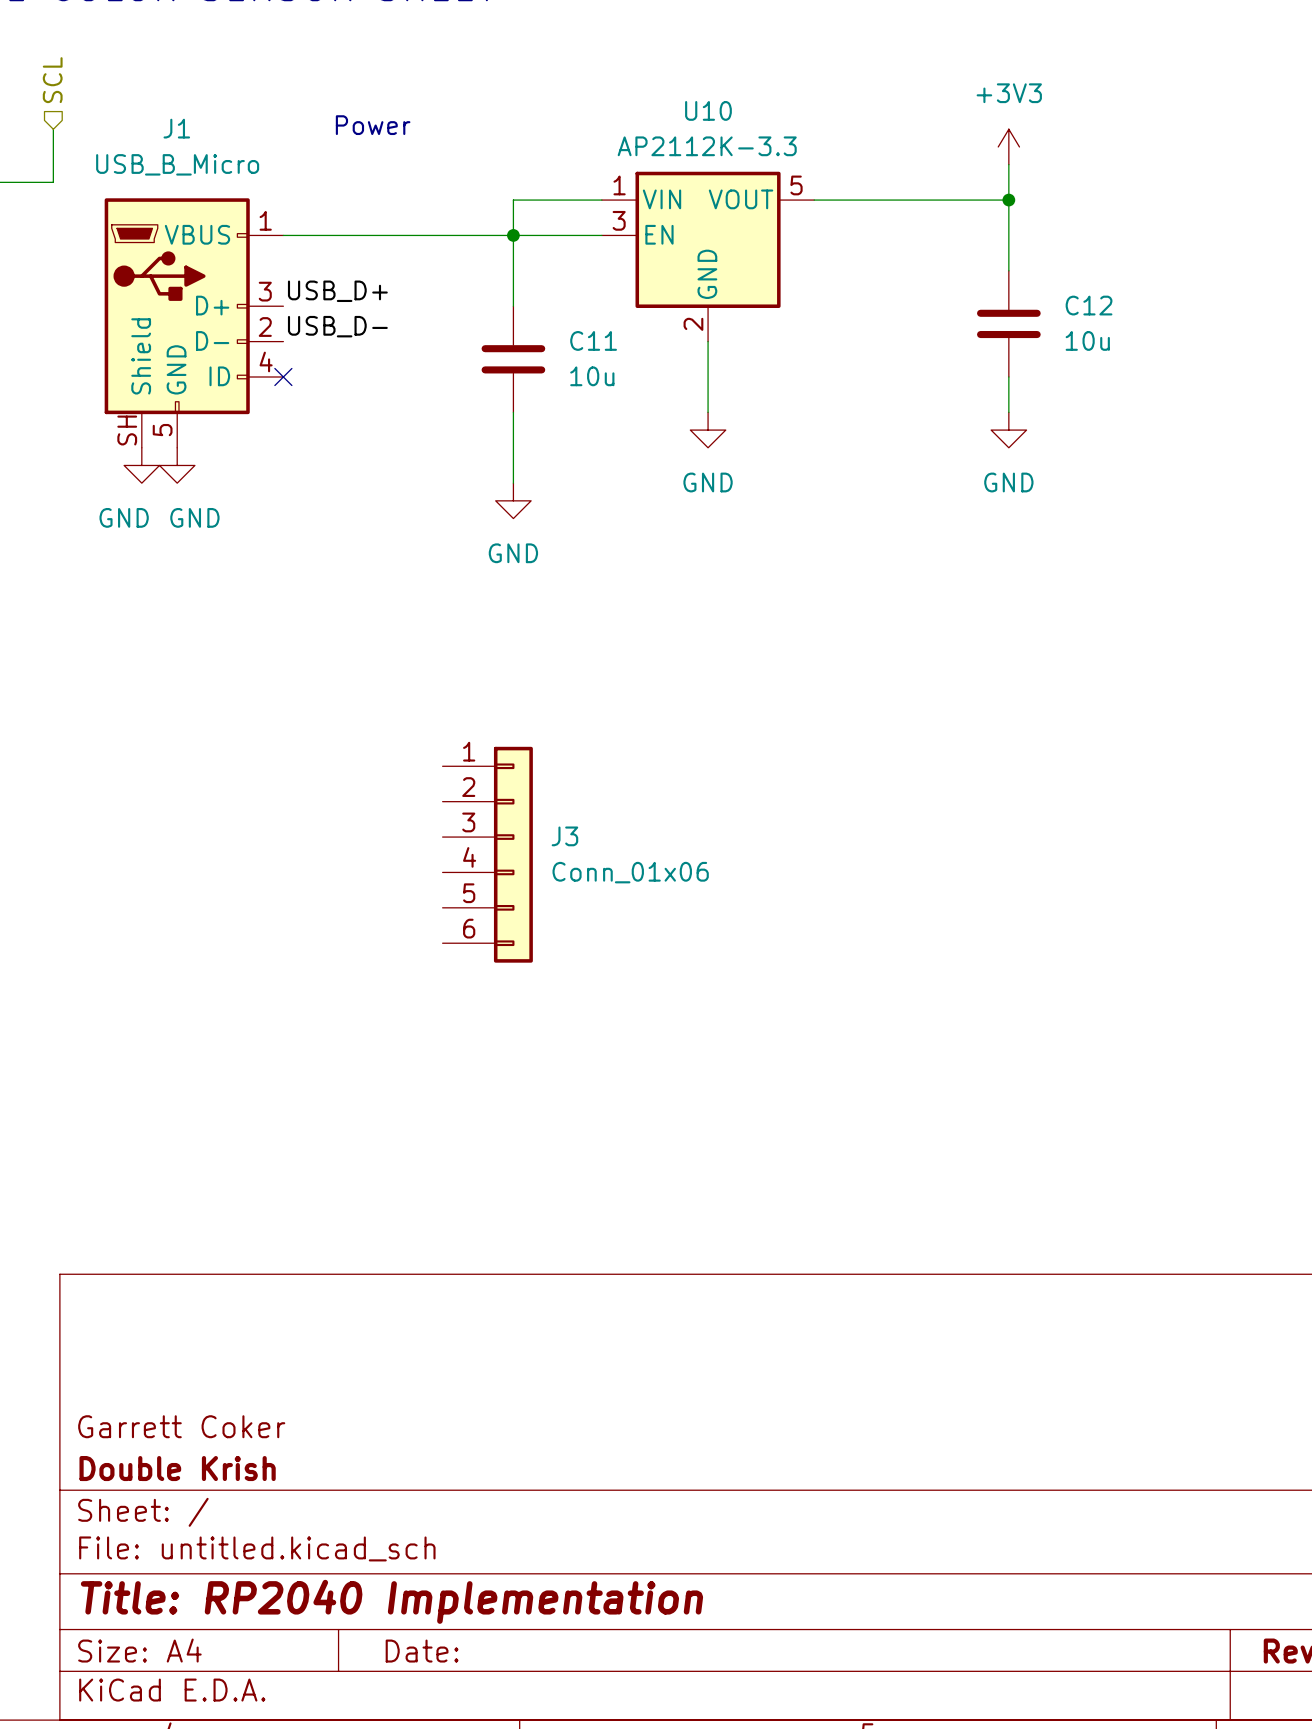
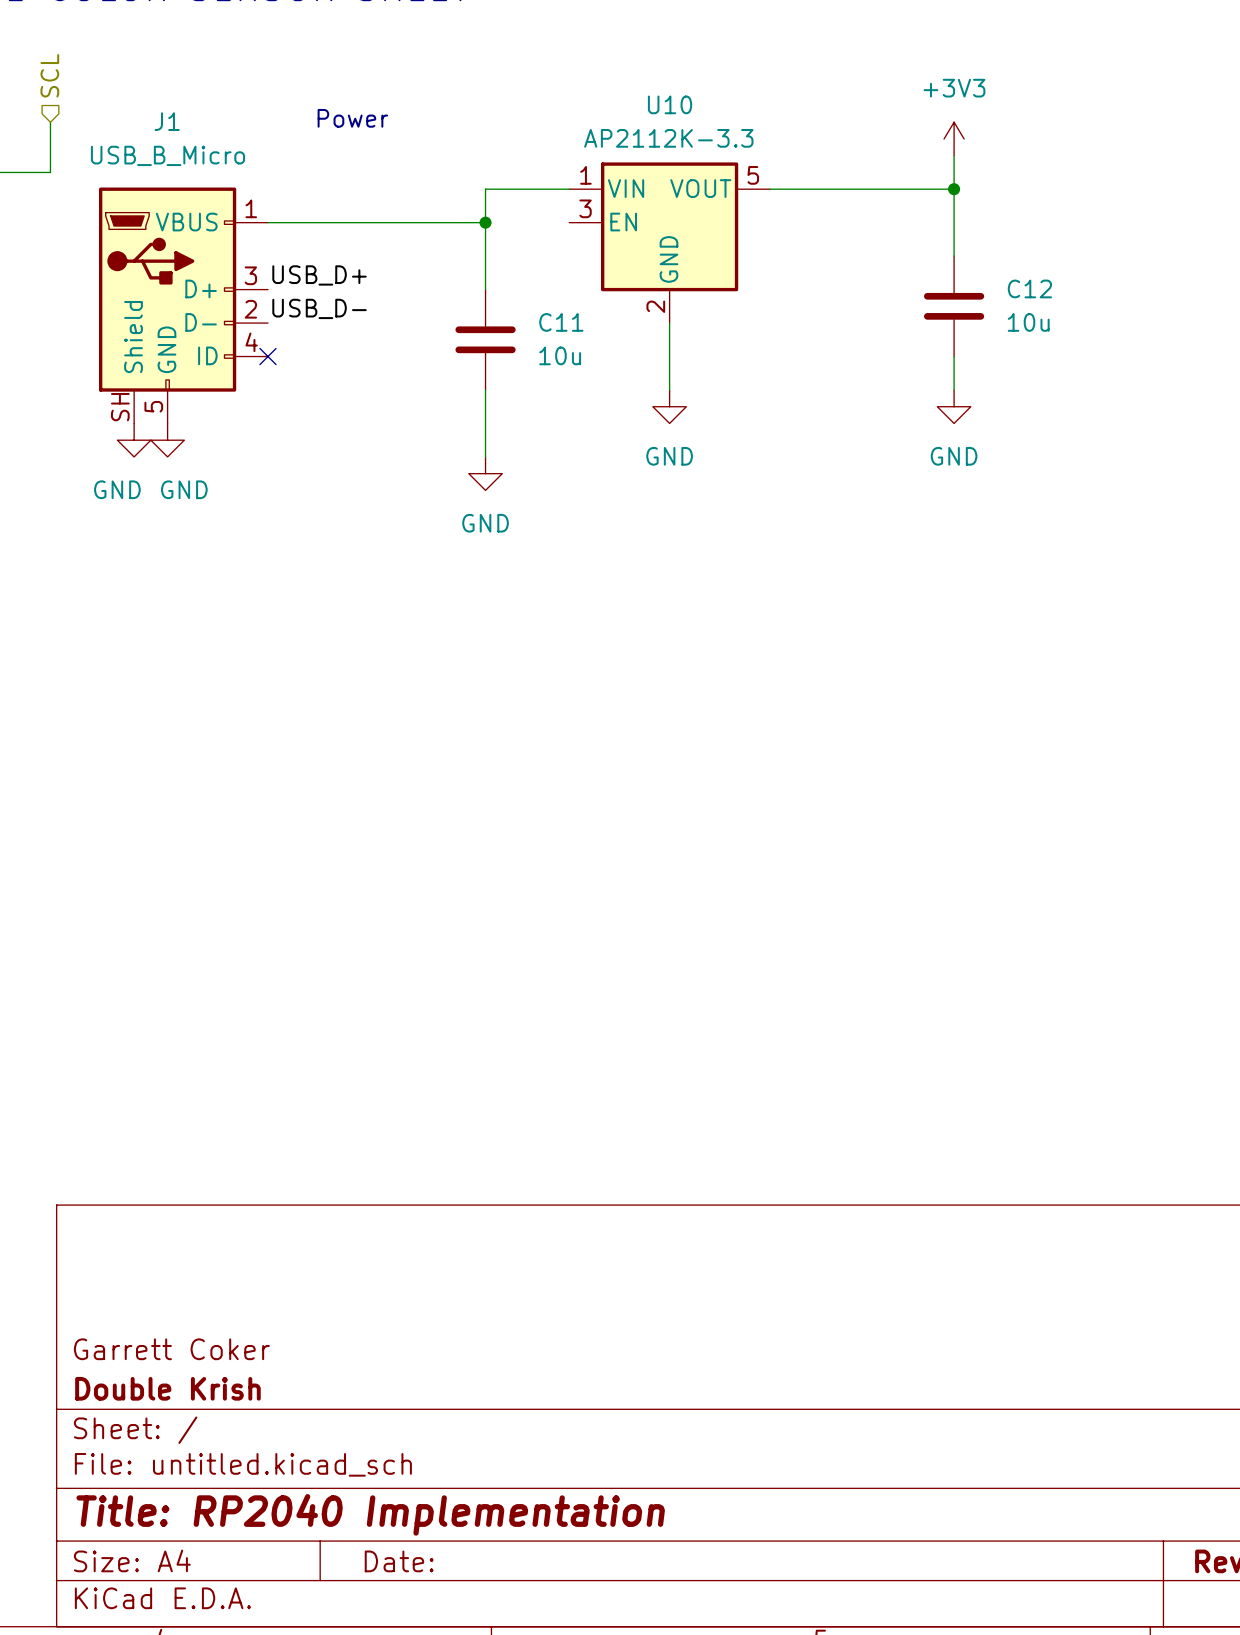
wire: (513, 235) (601, 235) -> none
J3: Conn_01x06 (487, 854) -> none

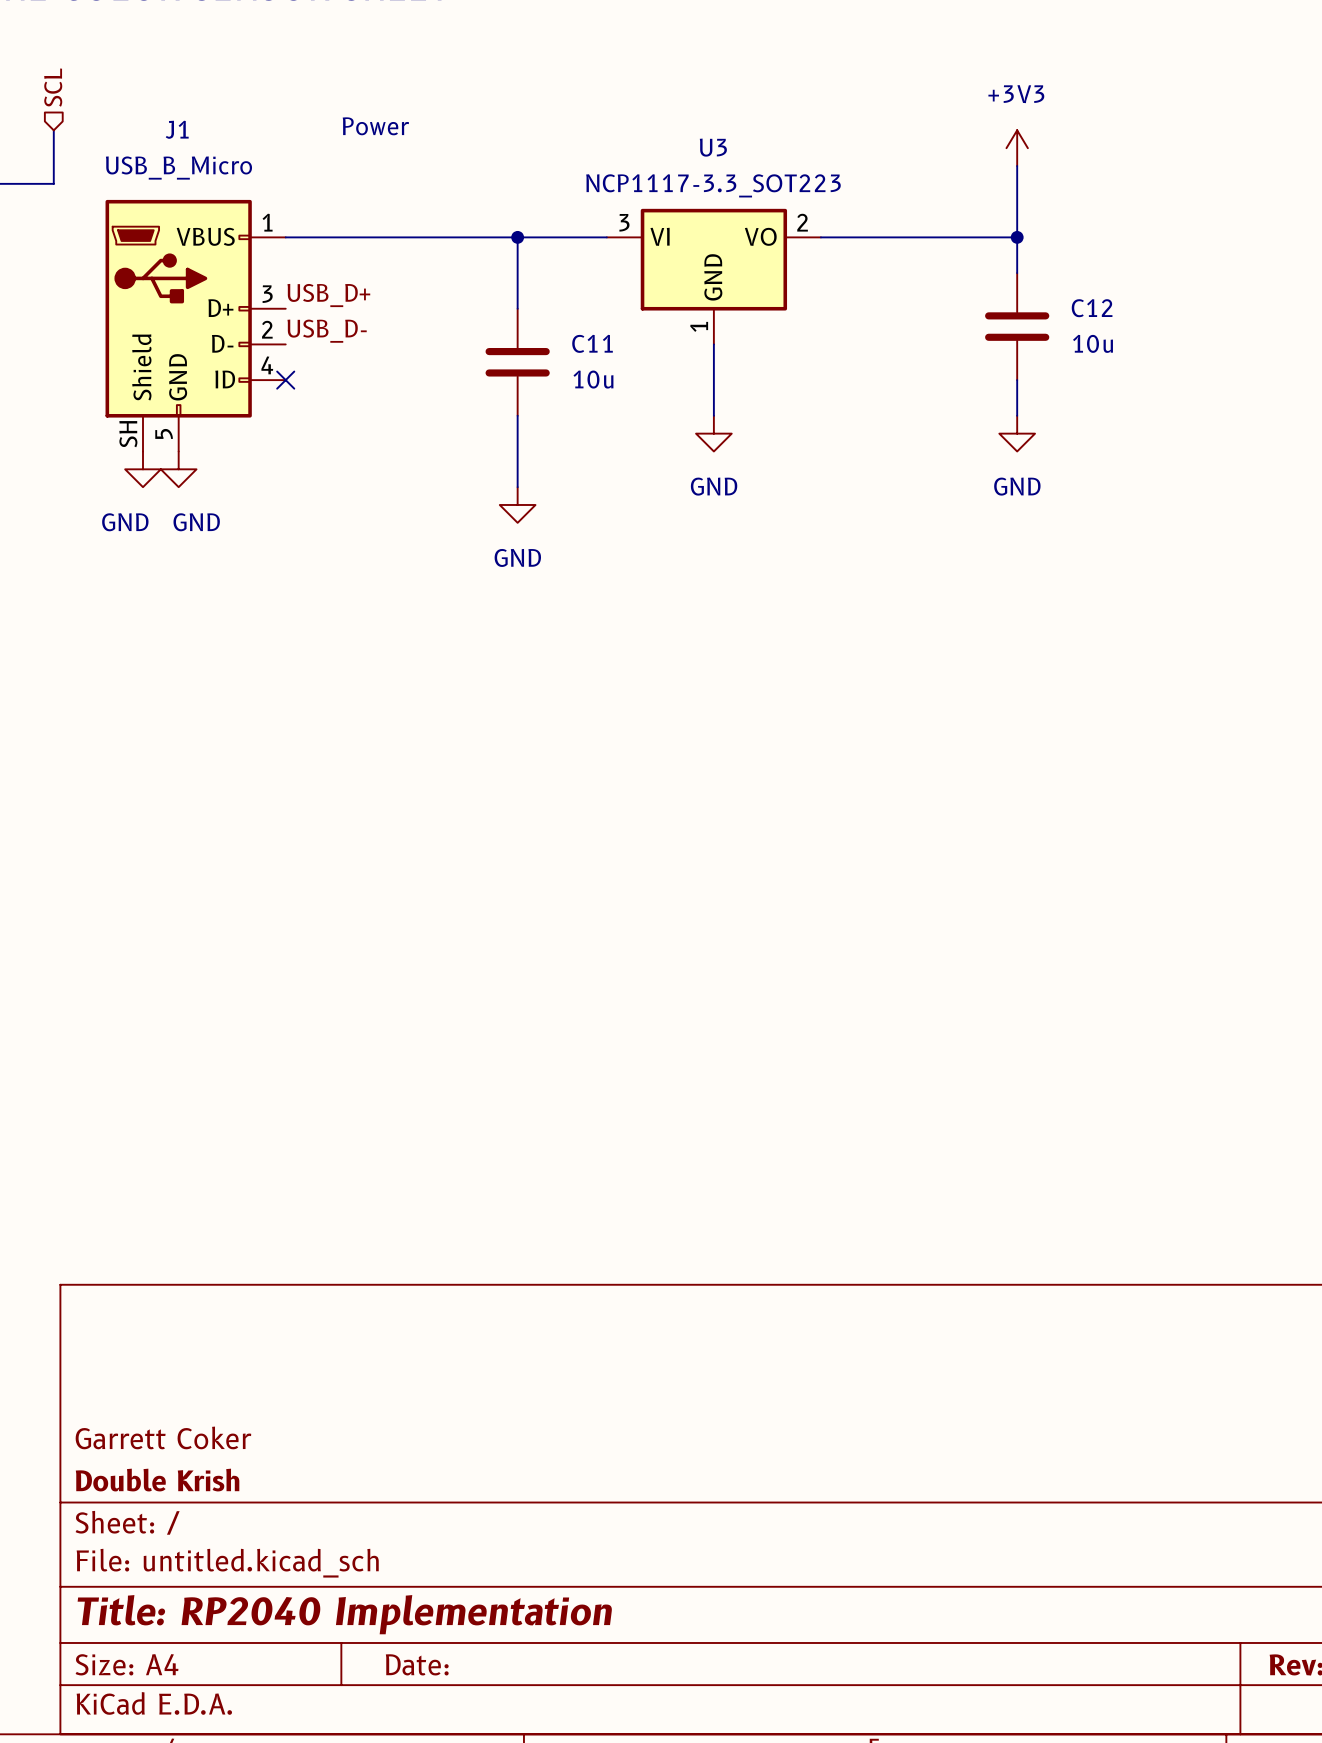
wire: (569, 189) (485, 189) (485, 222) -> (606, 237) (517, 237)
wire: (770, 189) (954, 189) -> (820, 237) (1017, 237)
junction position: (954, 189) -> (1017, 237)
U10: AP2112K-3.3 (669, 242) -> none
U3: none -> NCP1117-3.3_SOT223 (713, 276)

